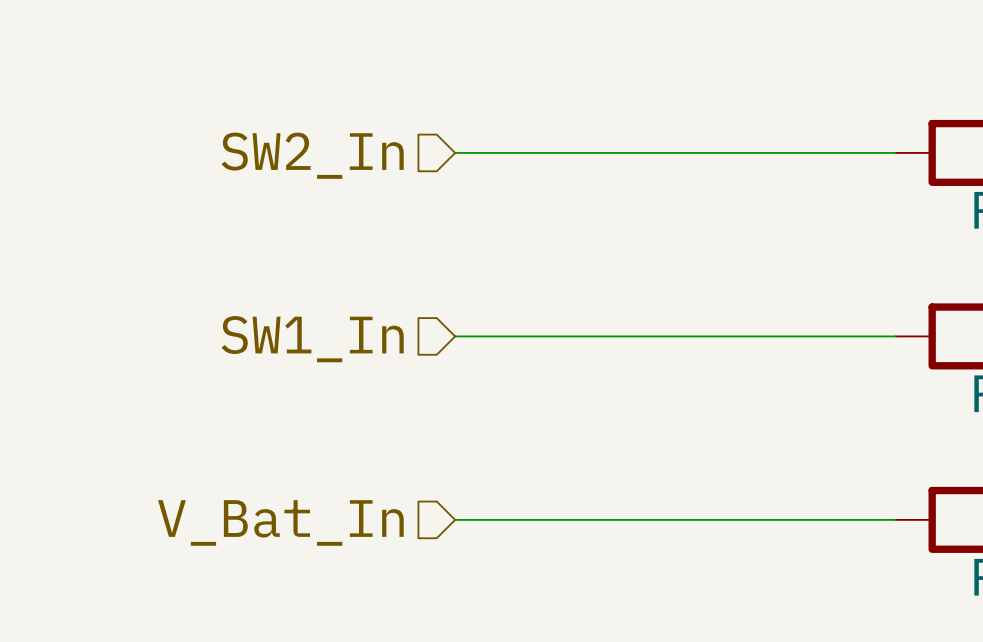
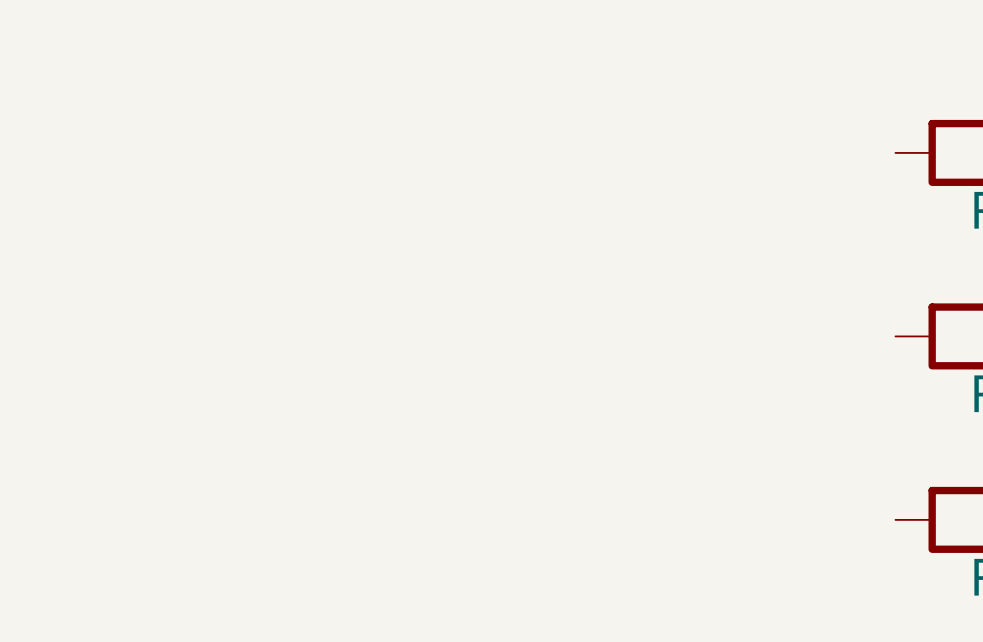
wire: (455, 152) (895, 152) -> none
hierarchical label: SW2_In (312, 155) -> none
wire: (455, 336) (895, 336) -> none
hierarchical label: SW1_In (312, 339) -> none
wire: (455, 519) (895, 519) -> none
hierarchical label: V_Bat_In (280, 522) -> none

